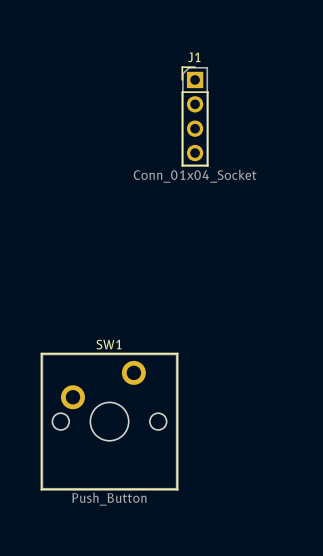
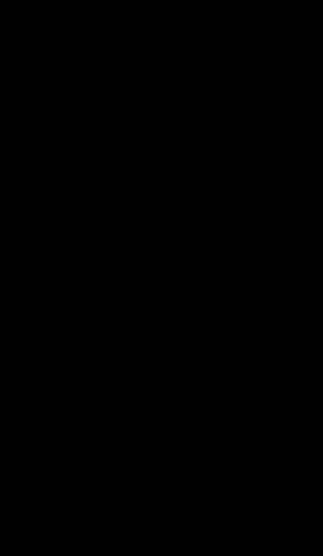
J1: Conn_01x04_Socket (195, 116) -> none
SW1: Push_Button (109, 421) -> none

